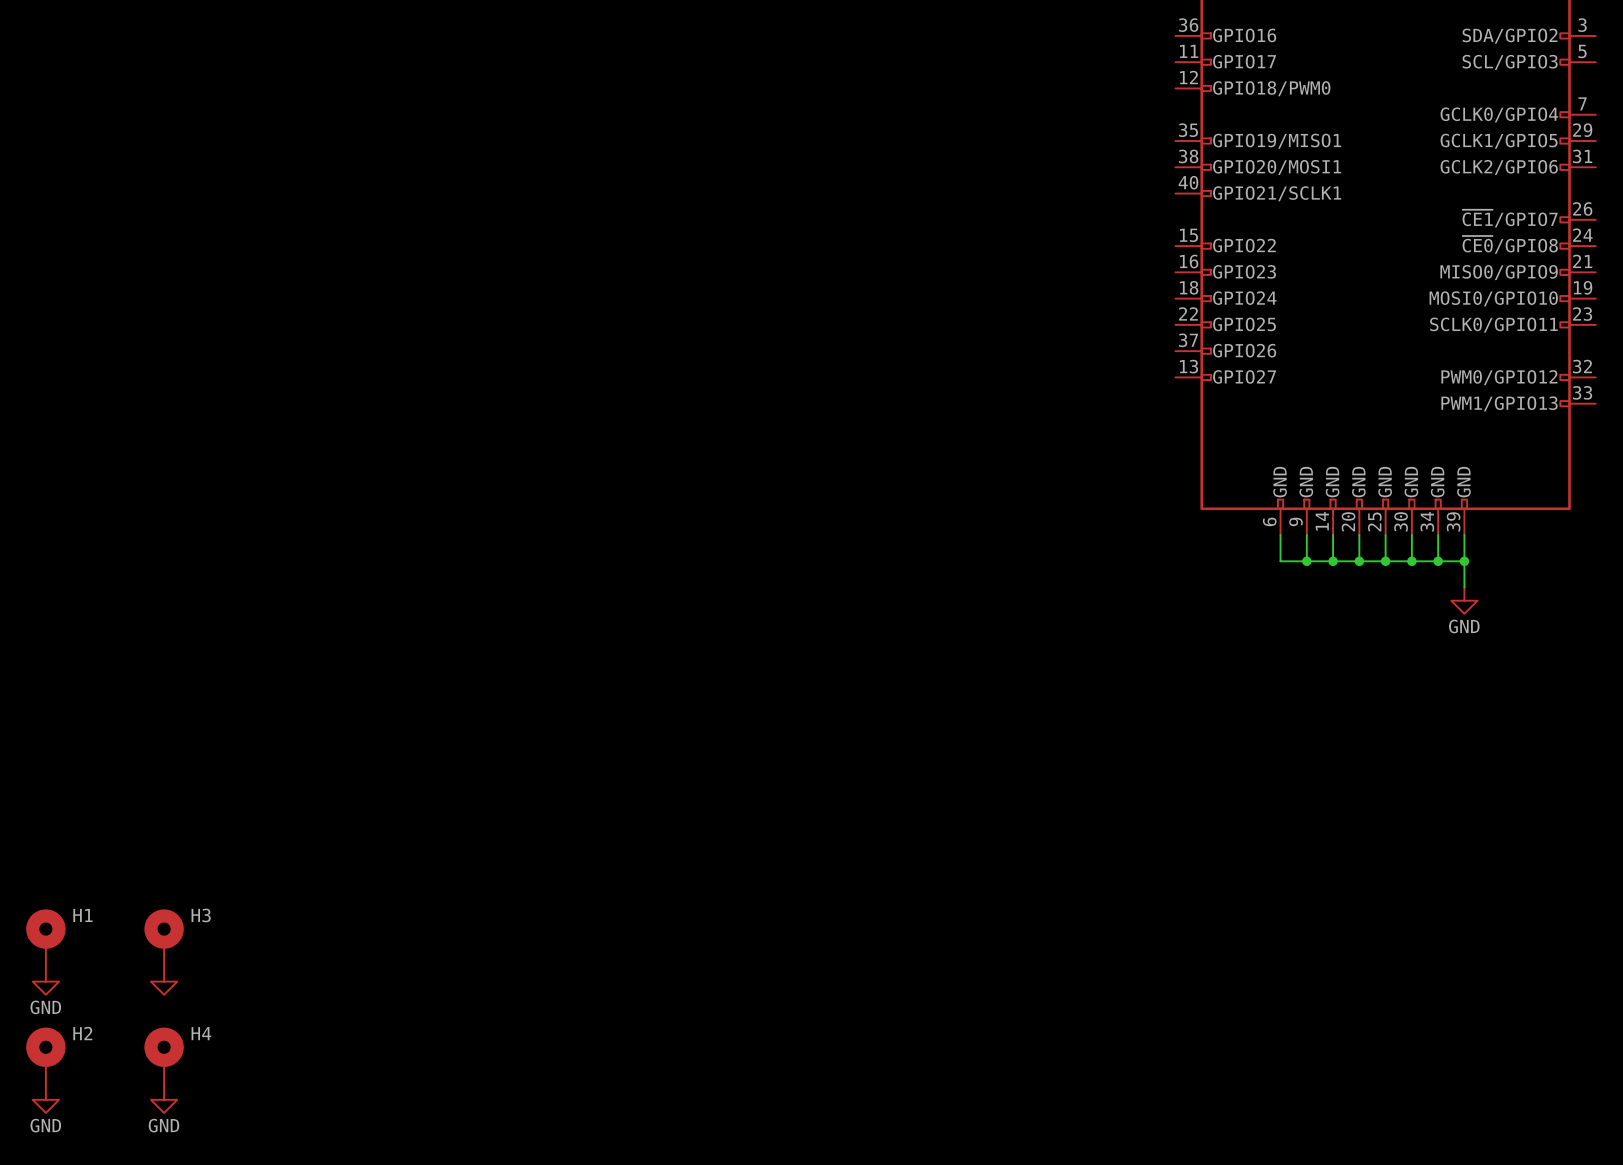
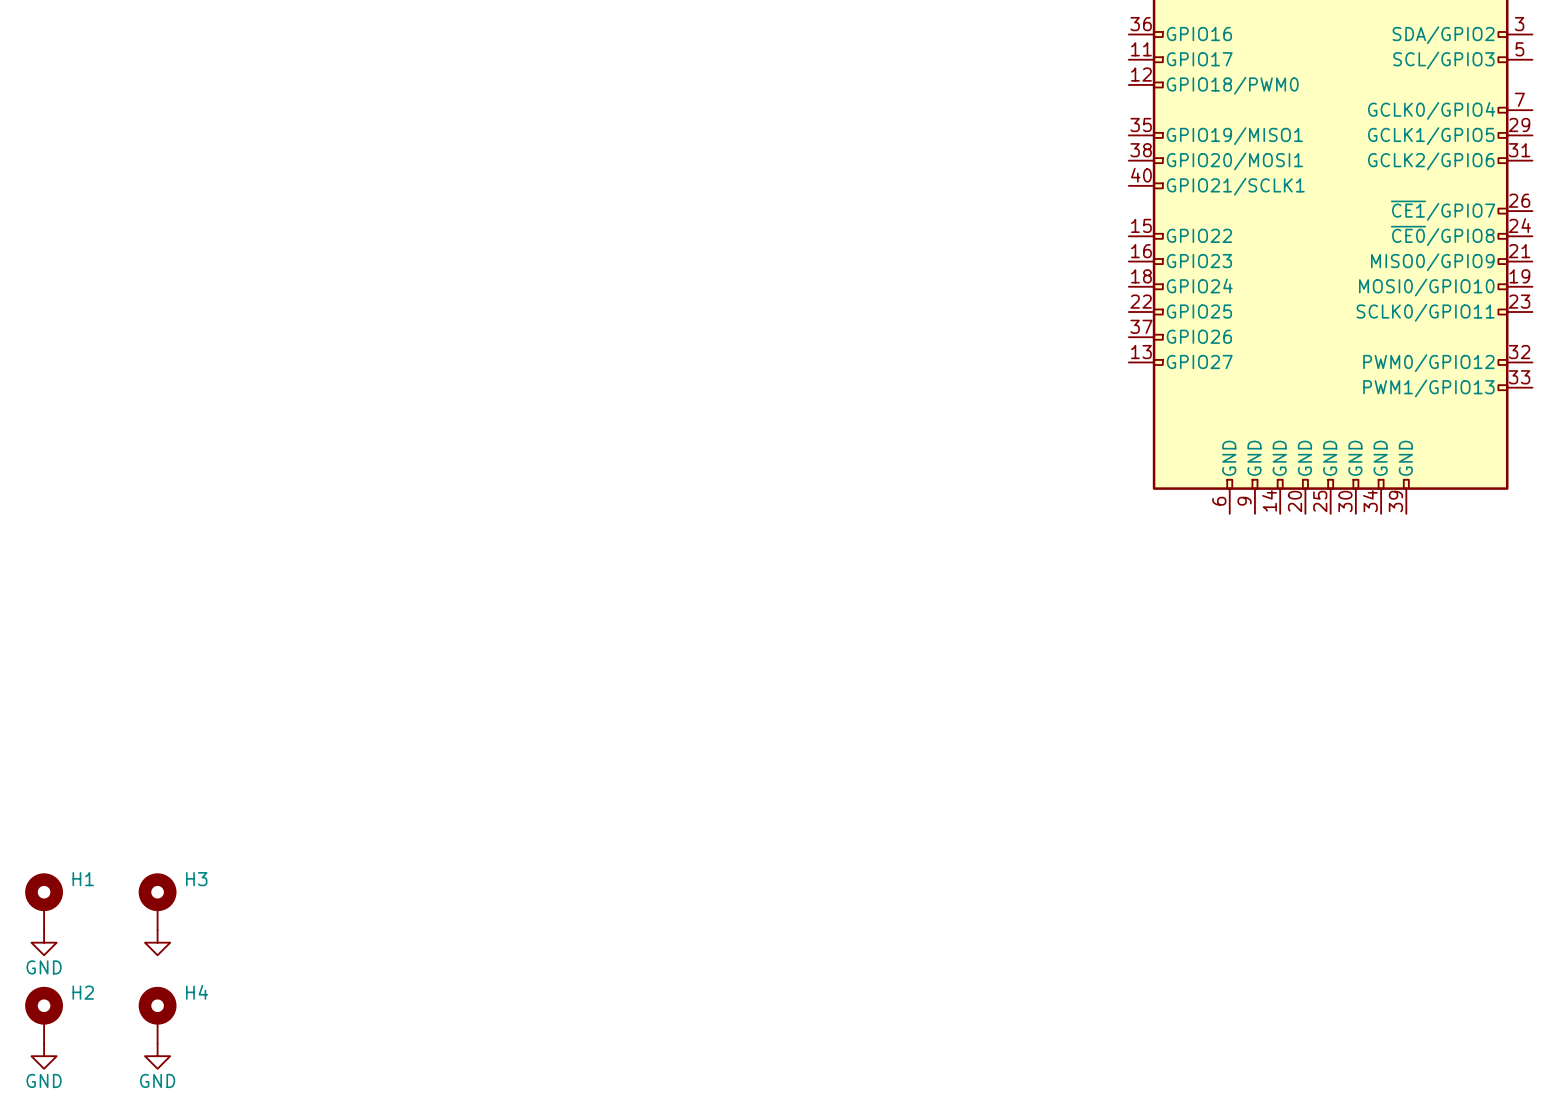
wire: (1280, 535) (1280, 561) (1464, 561) -> none
wire: (1306, 535) (1306, 561) -> none
wire: (1333, 535) (1333, 561) -> none
wire: (1359, 535) (1359, 561) -> none
wire: (1385, 535) (1385, 561) -> none
wire: (1411, 535) (1411, 561) -> none
wire: (1438, 535) (1438, 561) -> none
wire: (1464, 535) (1464, 587) -> none
junction: (1306, 561) -> none
junction: (1333, 561) -> none
junction: (1359, 561) -> none
junction: (1385, 561) -> none
junction: (1411, 561) -> none
junction: (1438, 561) -> none
junction: (1464, 561) -> none
power symbol: GND (1464, 600) -> none

